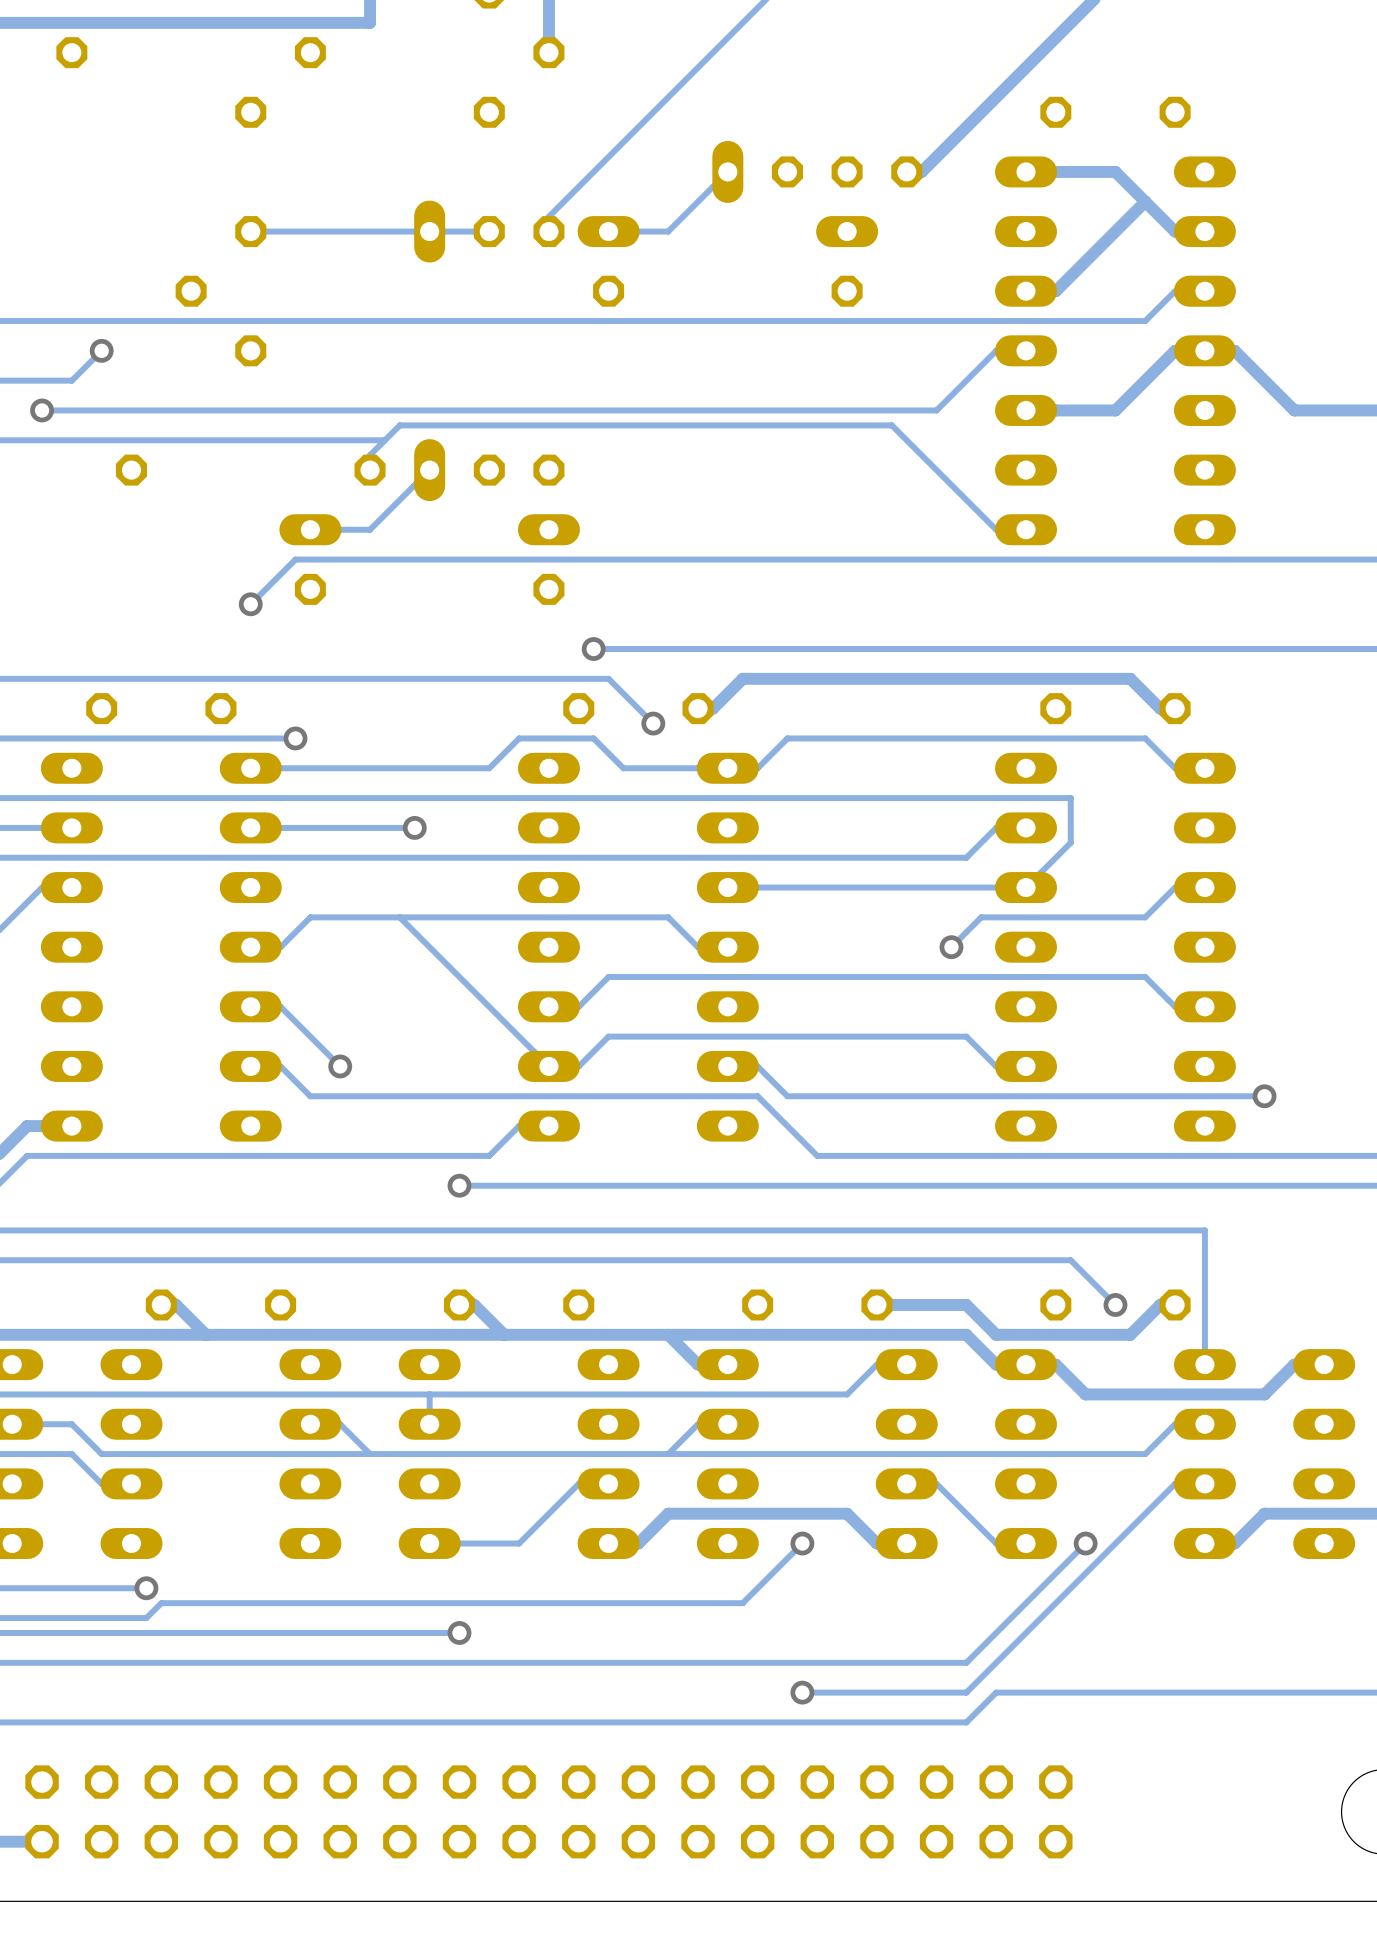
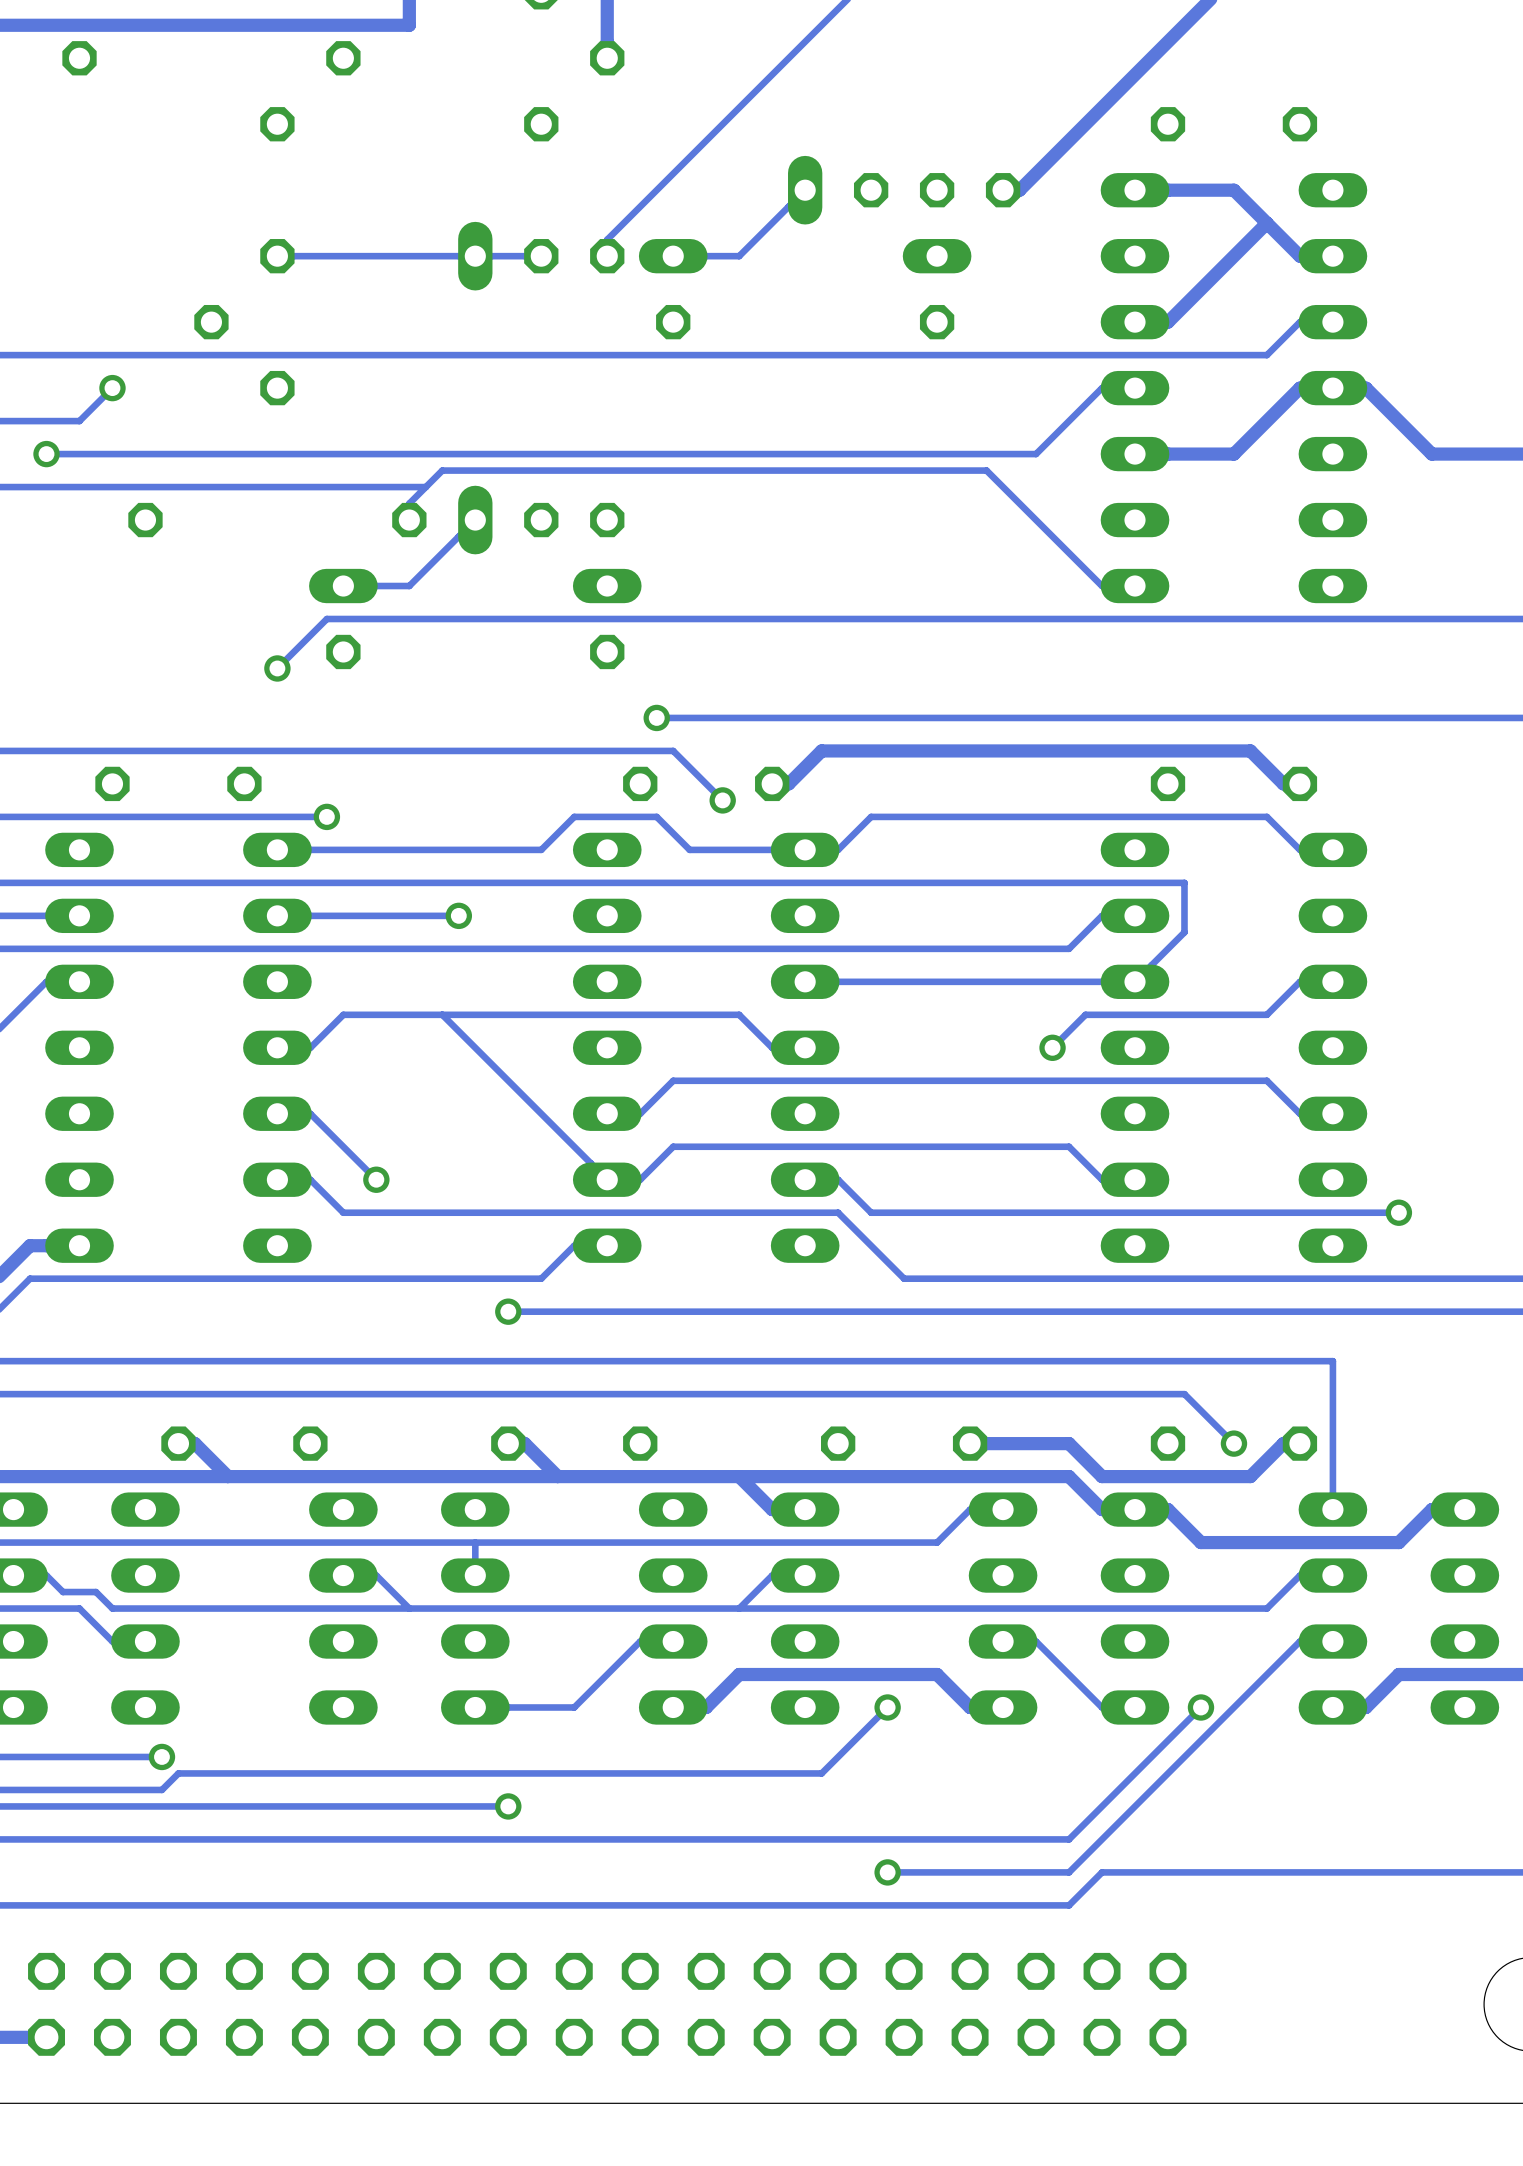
track: (42, 1424) (71, 1424) (86, 1439) -> (46, 1575) (63, 1592) (95, 1592)

